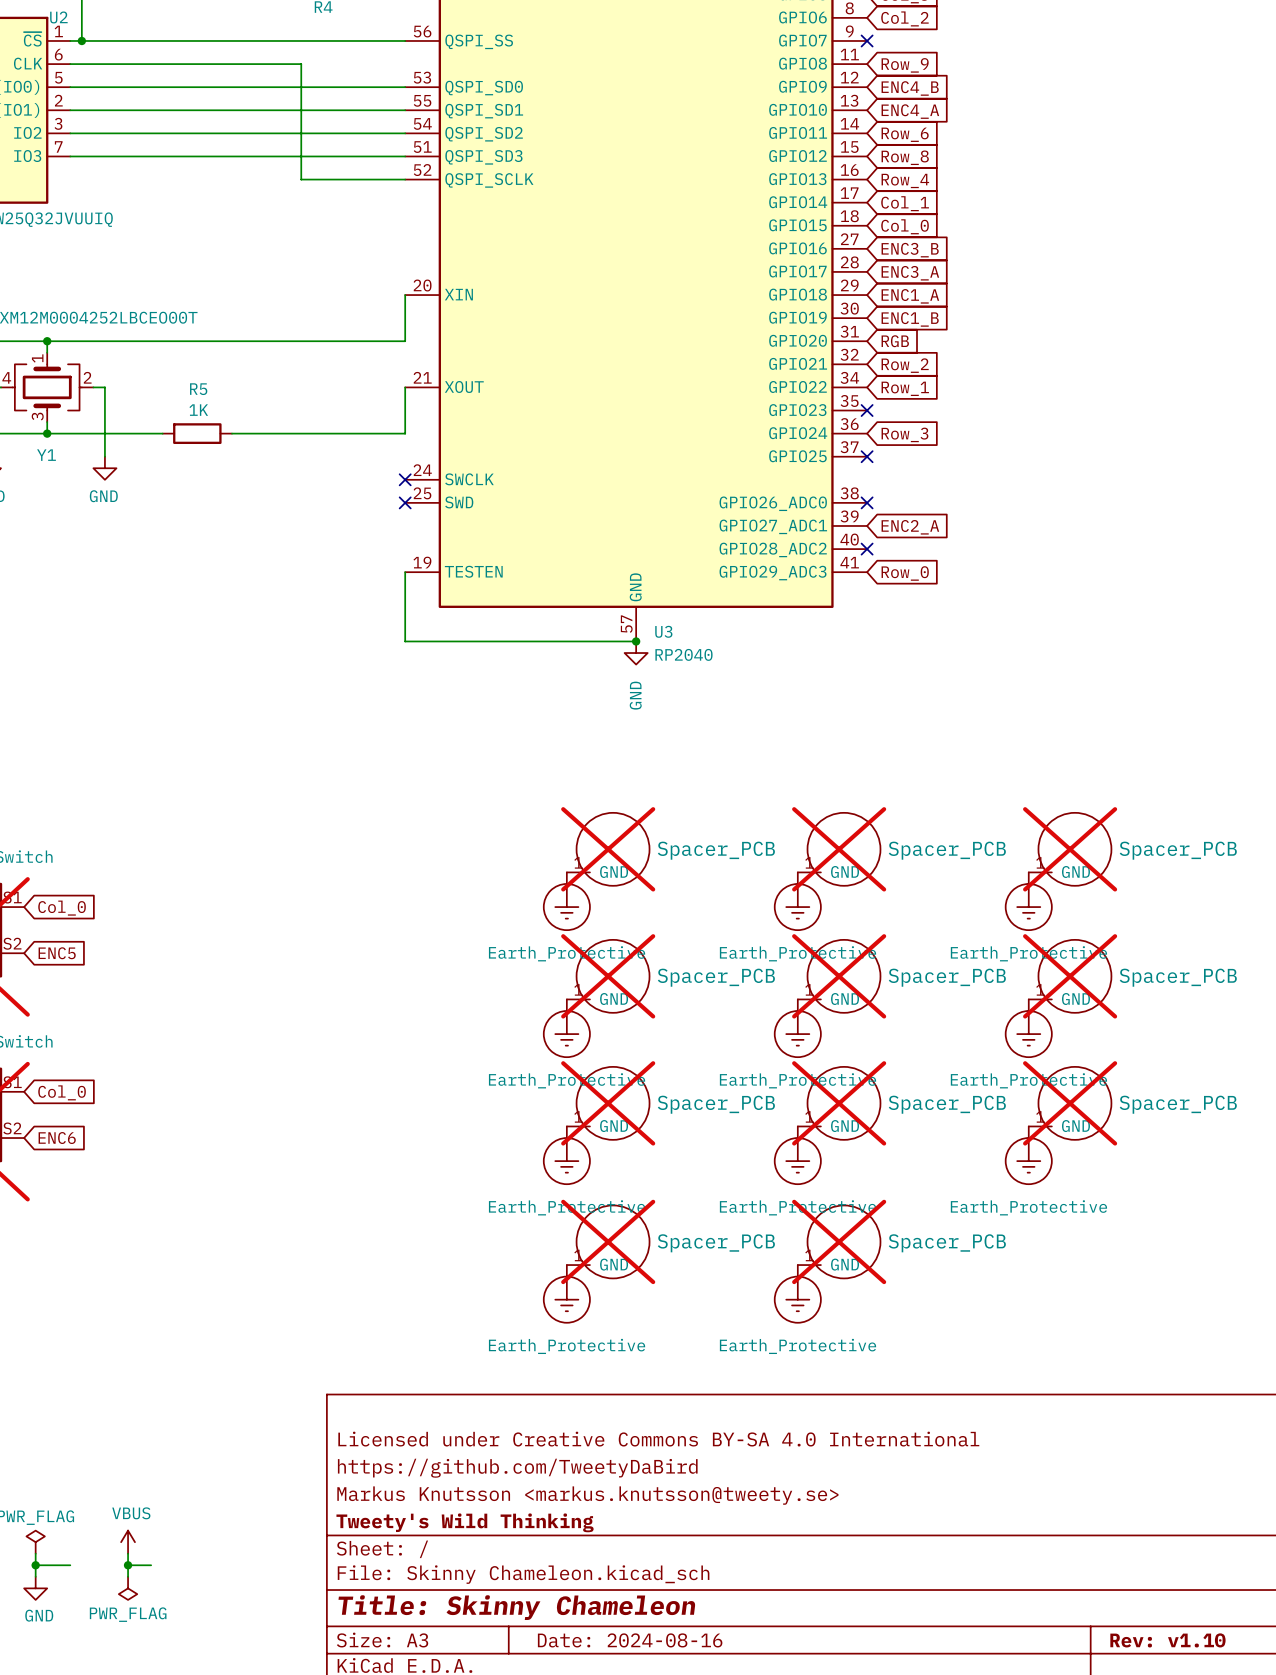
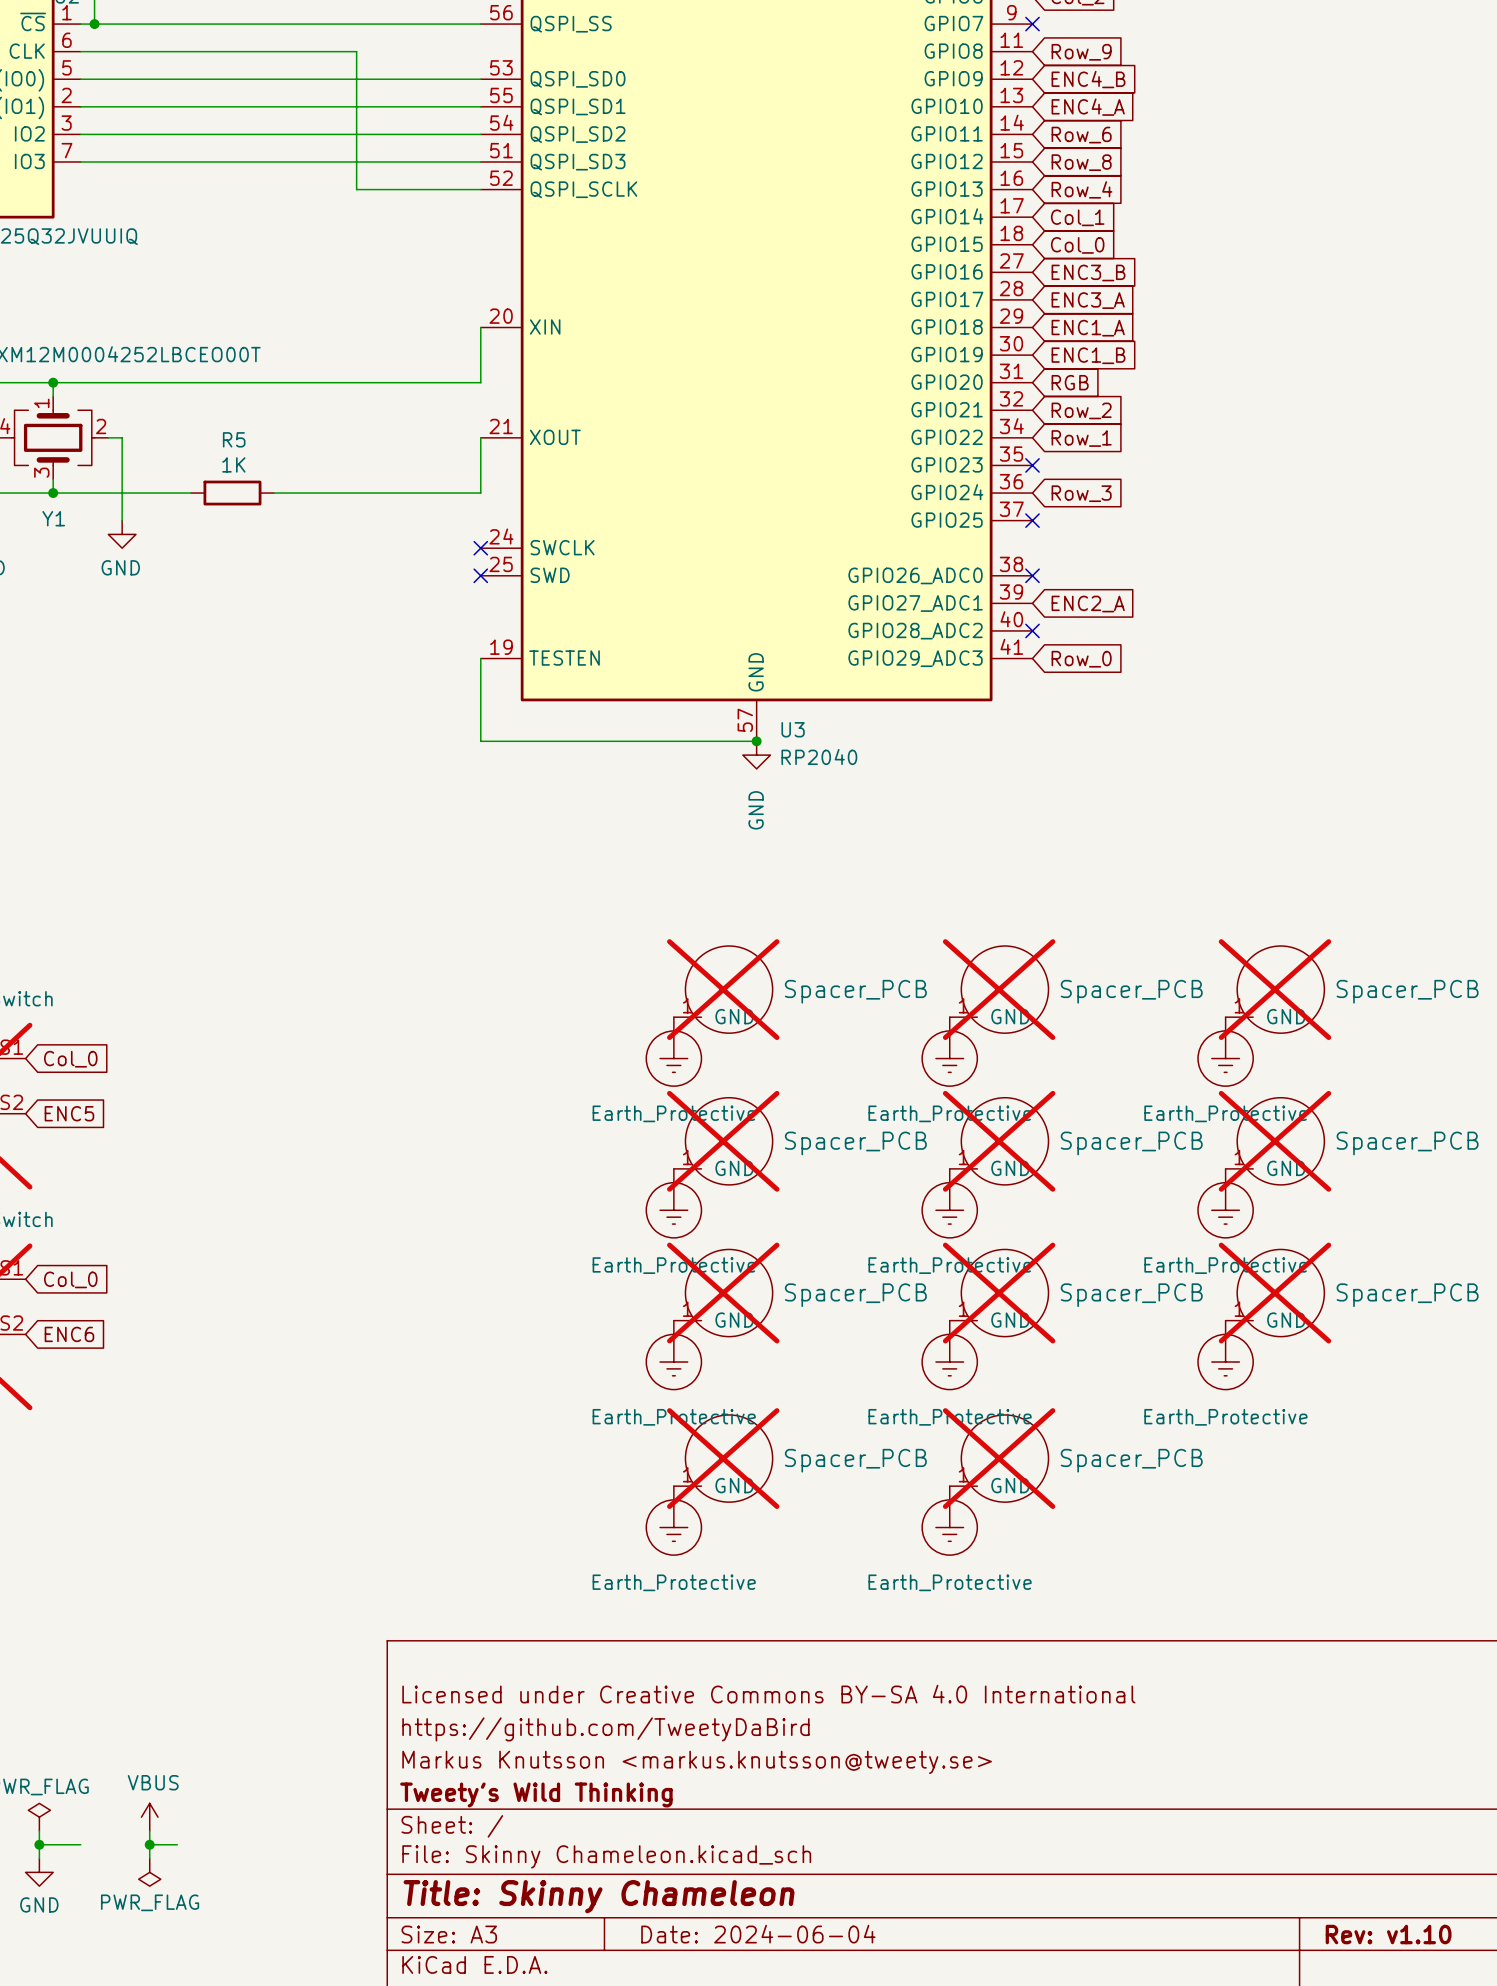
title block: Date: 2024-08-16 (630, 1640) -> Date: 2024-06-04 (758, 1934)

